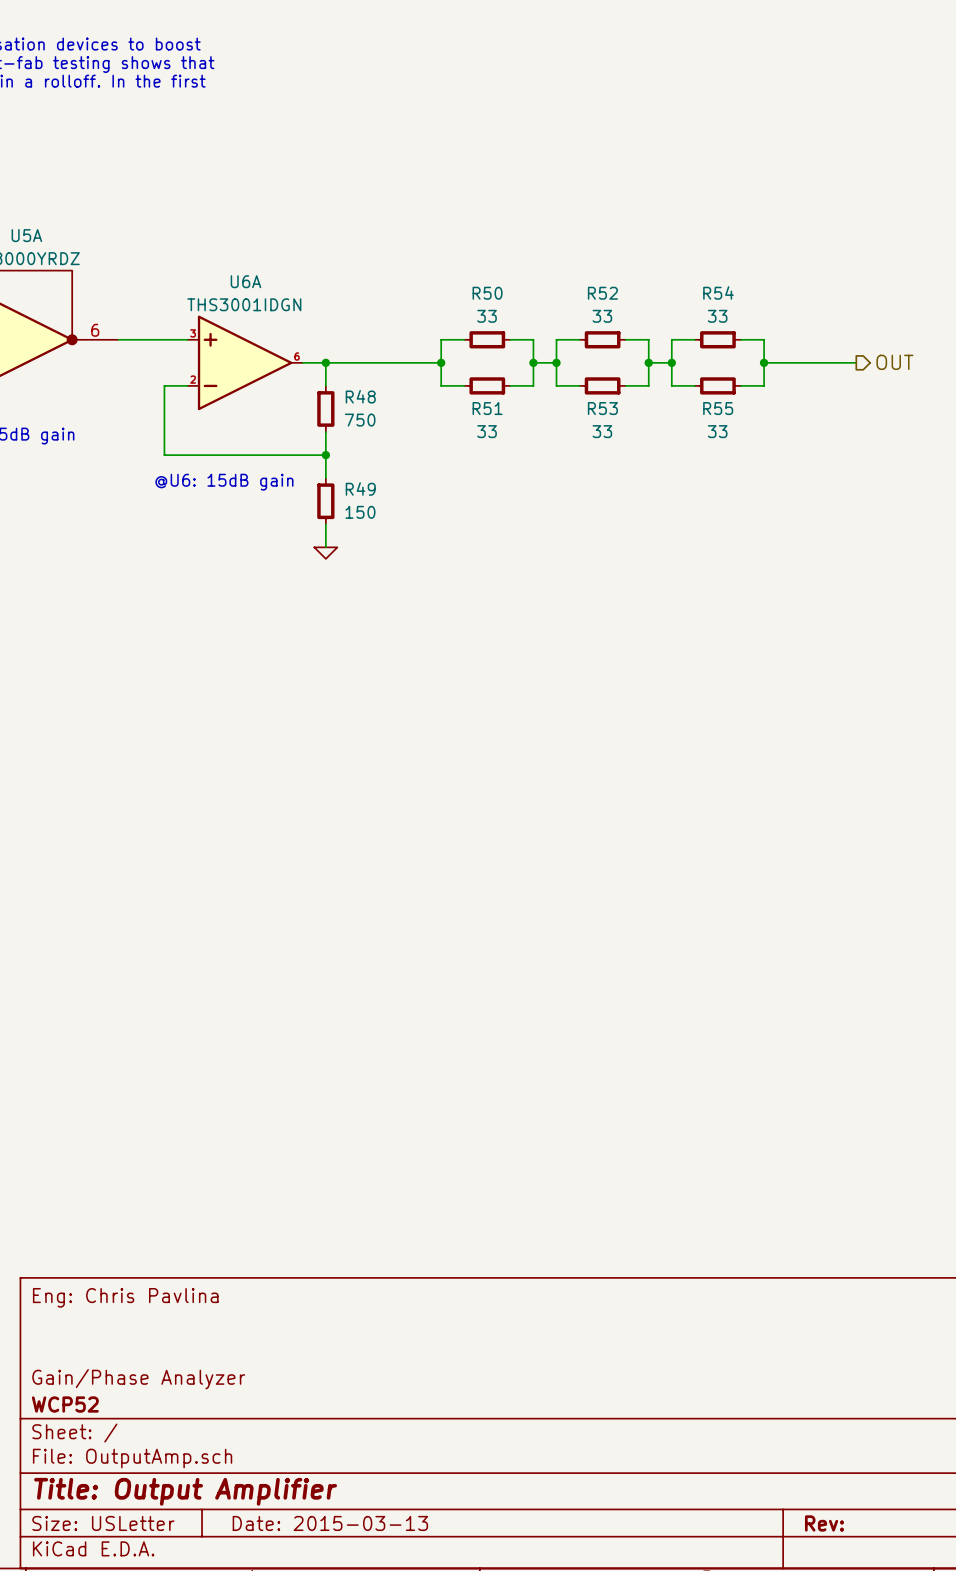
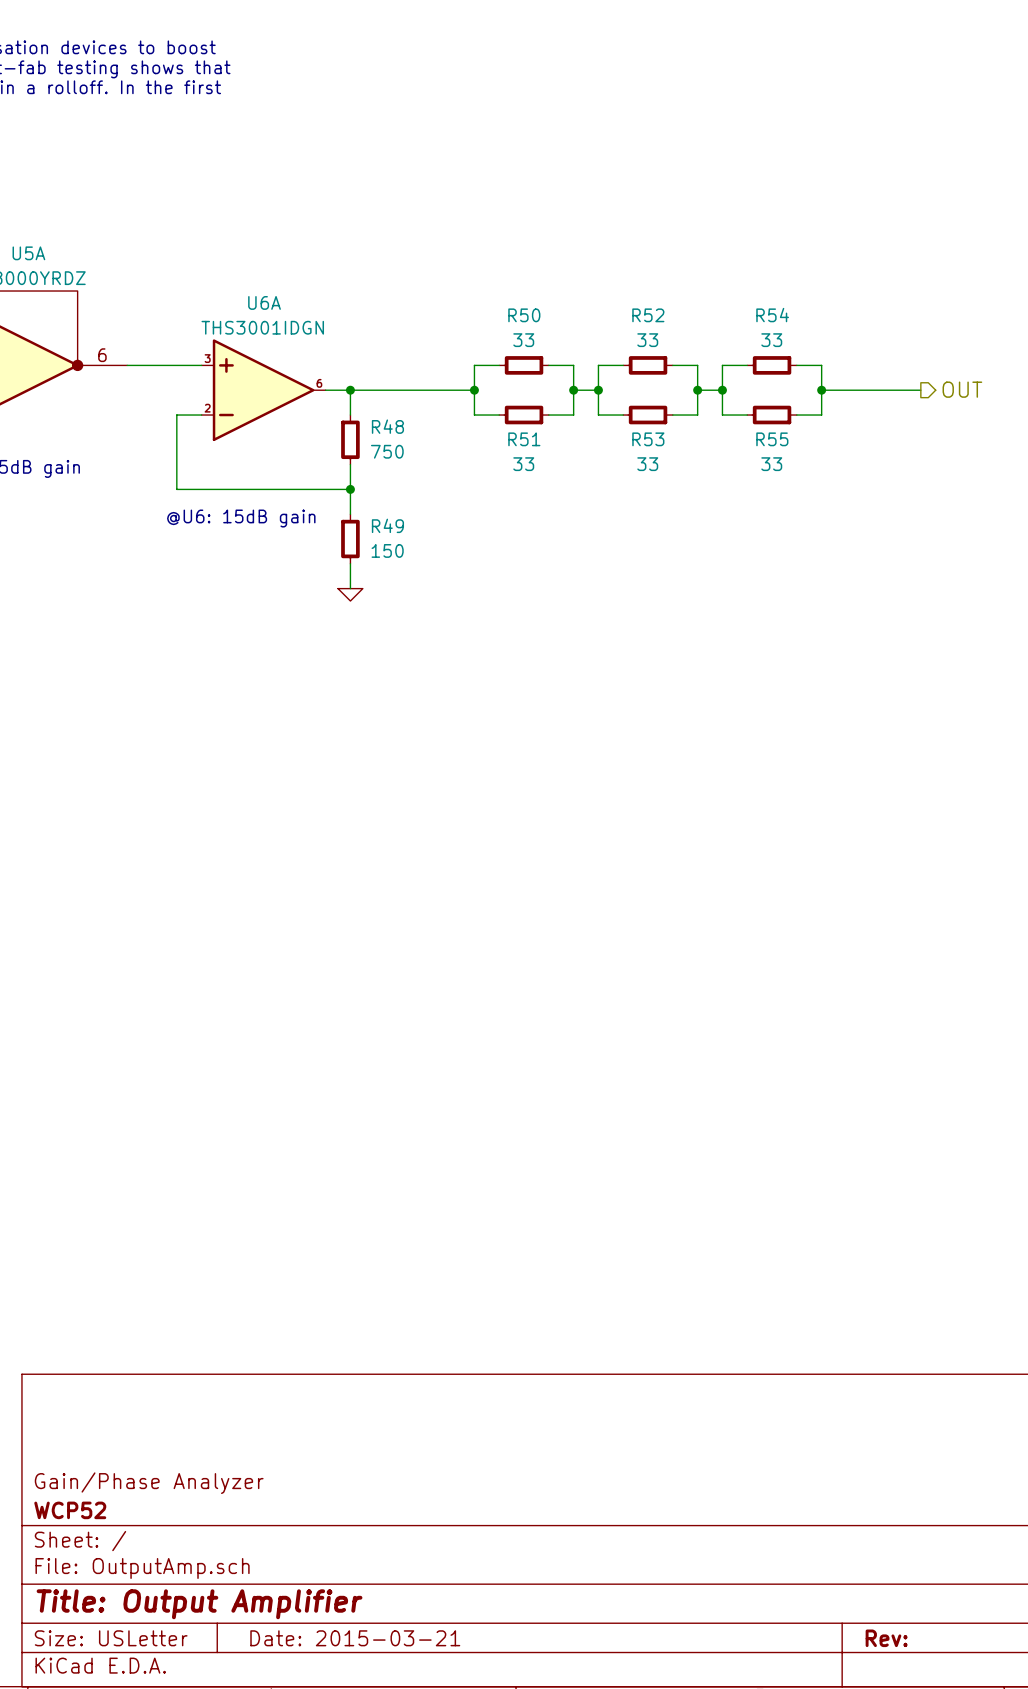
title block: Eng: Chris Pavlina (125, 1297) -> none
title block: Date: 2015-03-13 (330, 1523) -> Date: 2015-03-21 (355, 1638)

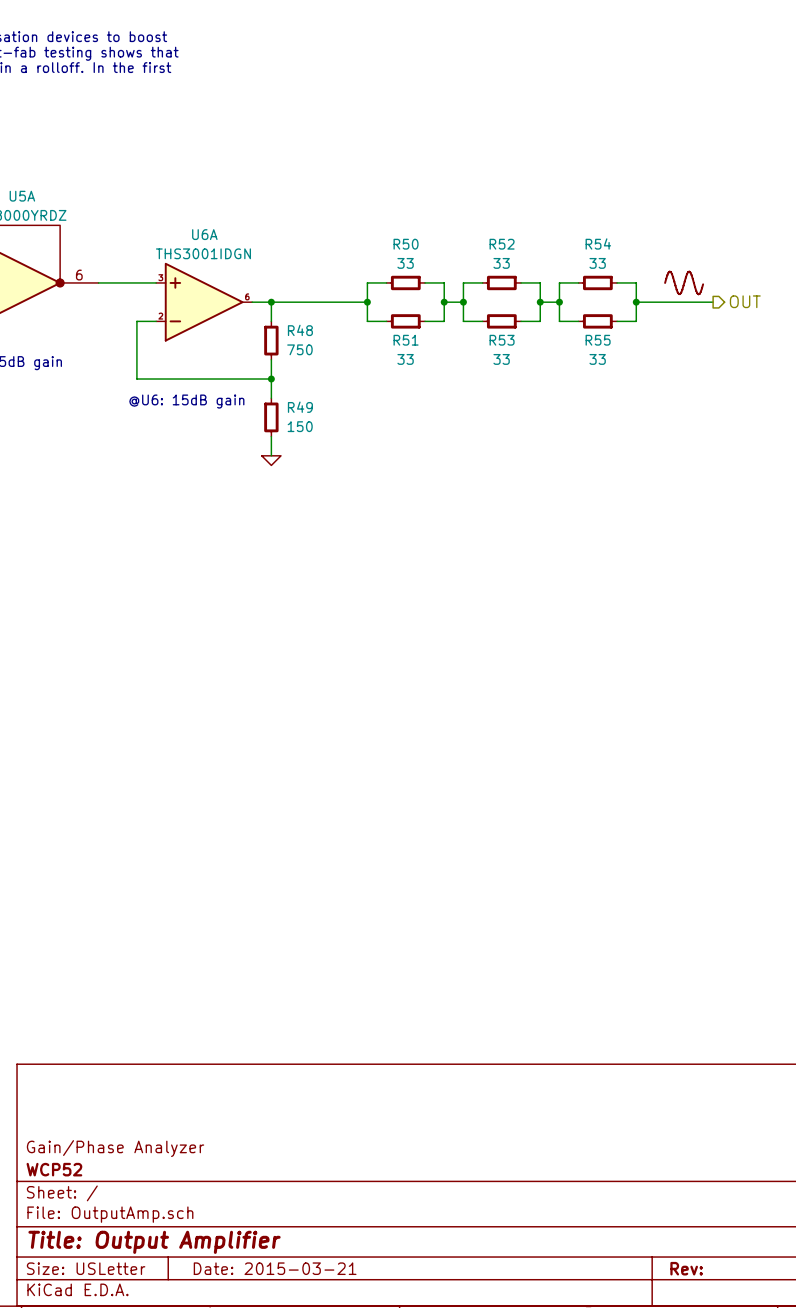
power symbol: none -> (684, 282)

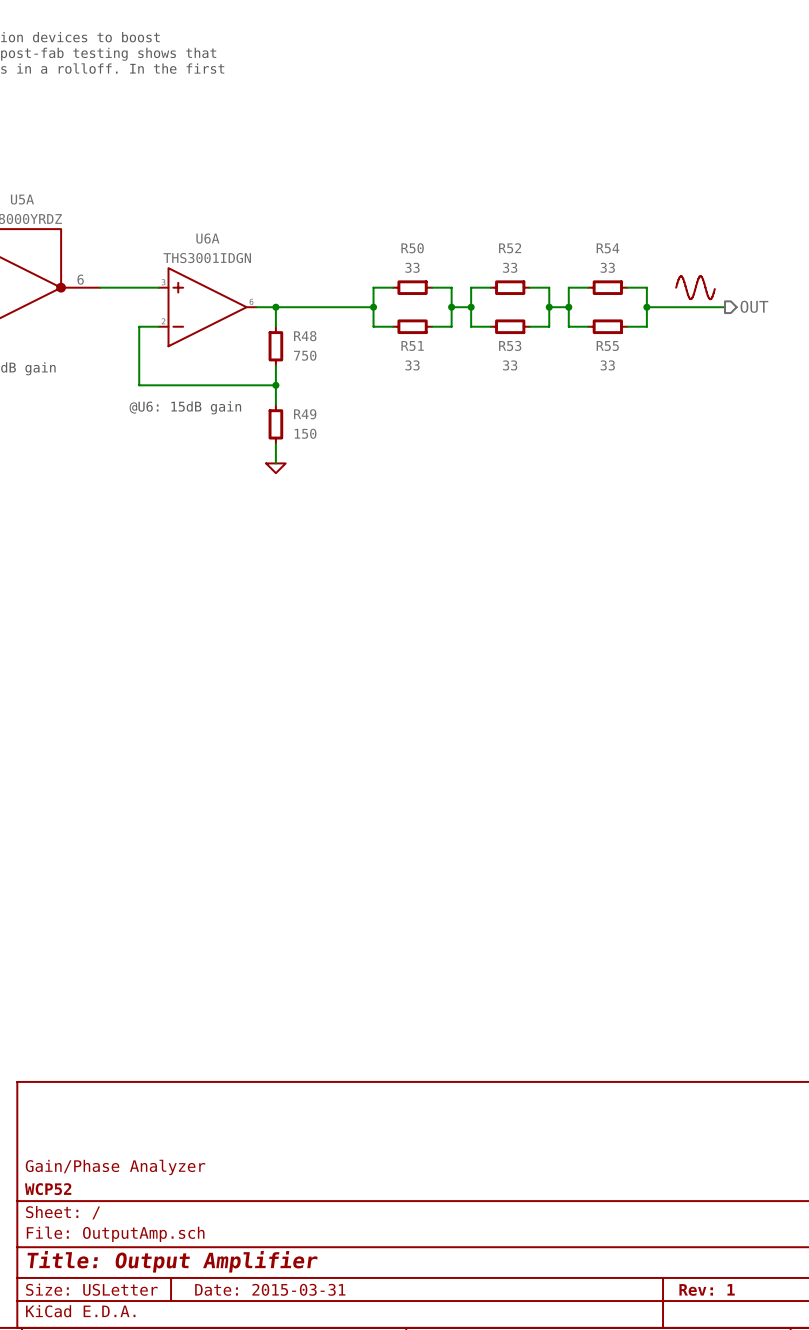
title block: Date: 2015-03-21 (275, 1268) -> Date: 2015-03-31 (270, 1289)
title block: Rev: (686, 1268) -> Rev: 1 (707, 1289)

